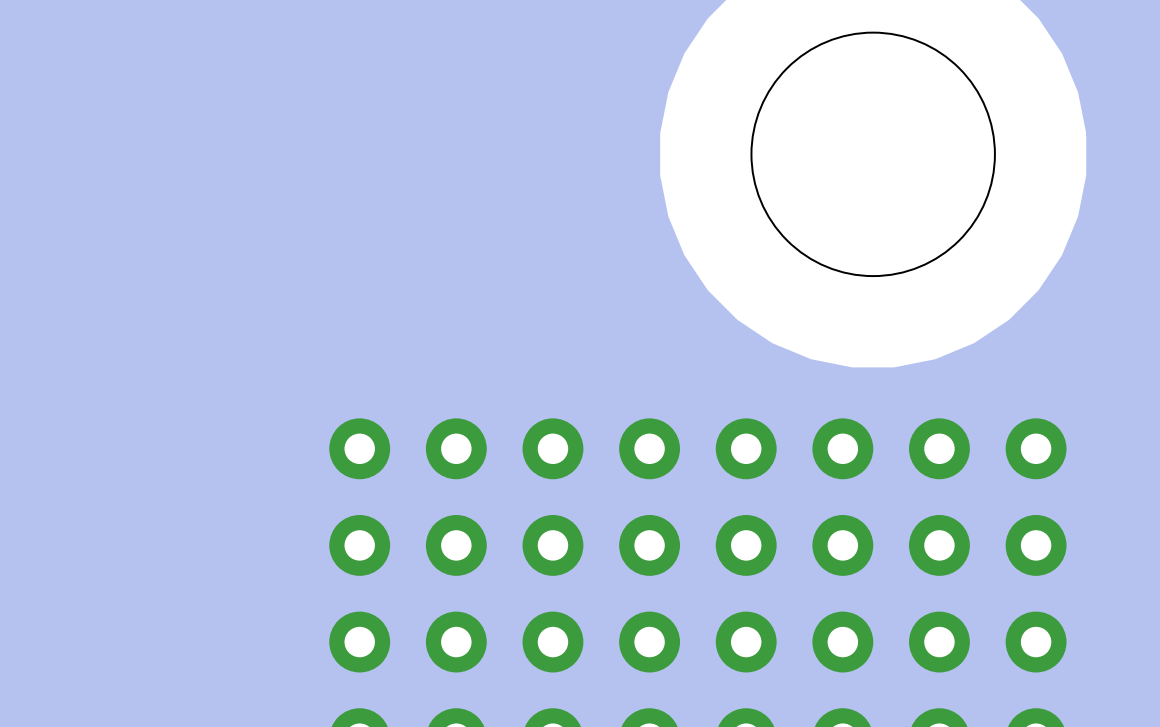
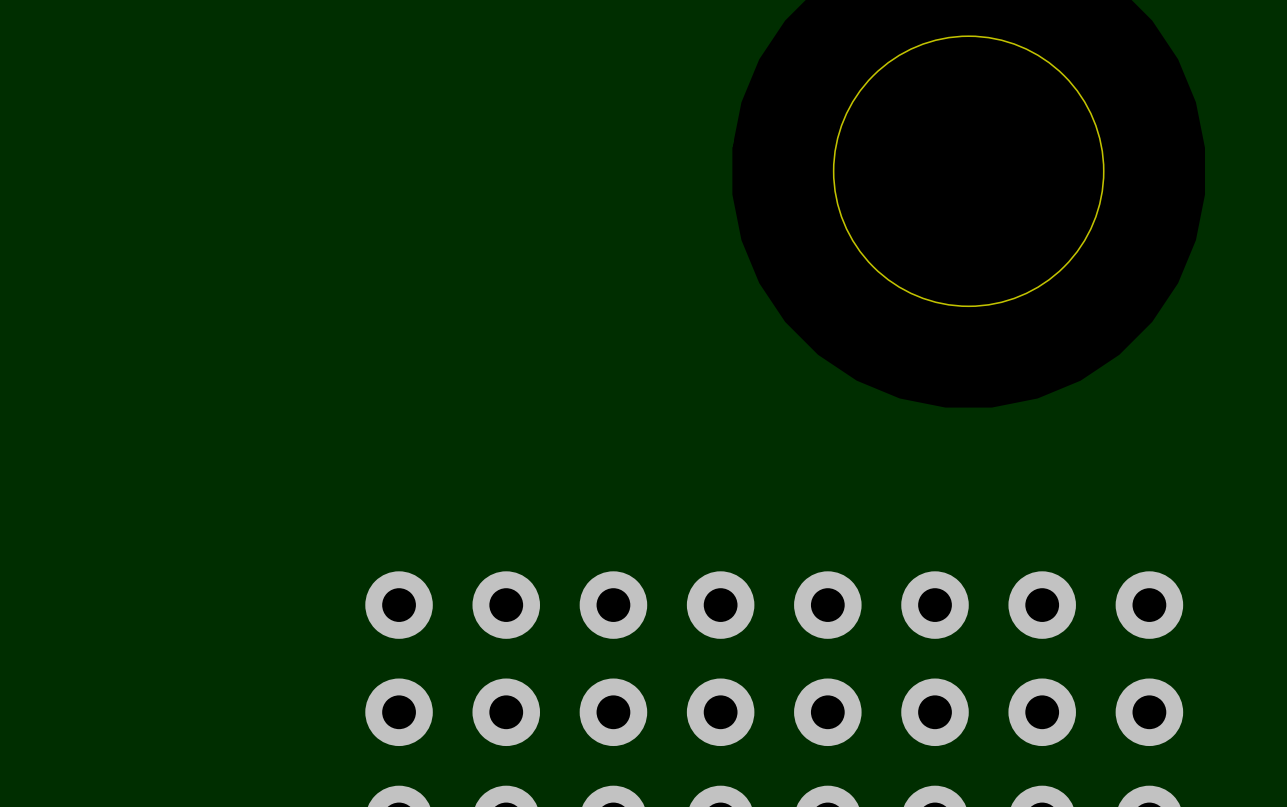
via: (359, 448) -> none
via: (456, 448) -> none
via: (552, 448) -> none
via: (649, 448) -> none
via: (746, 448) -> none
via: (842, 448) -> none
via: (939, 448) -> none
via: (1036, 448) -> none

